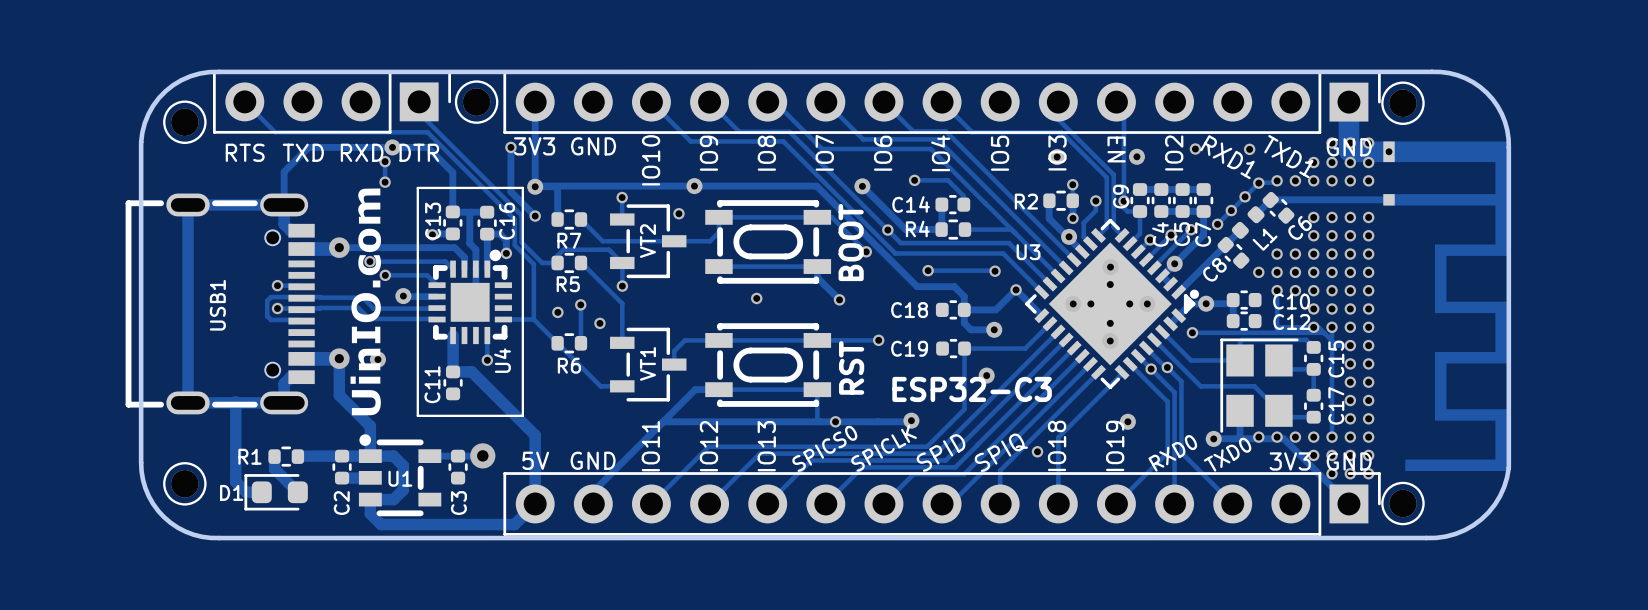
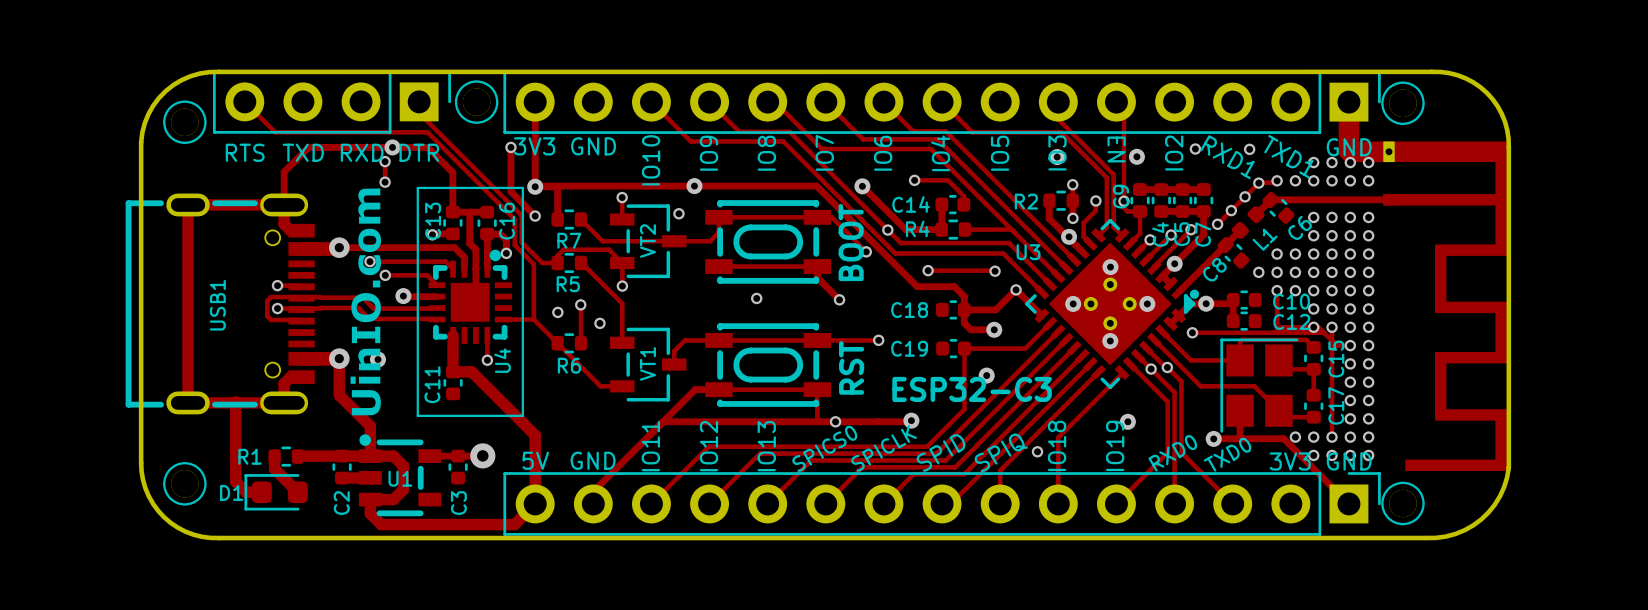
via: (1332, 143) -> none
via: (1350, 143) -> none
via: (1368, 143) -> none
via: (1258, 437) -> none
via: (1277, 437) -> none
via: (1332, 473) -> none
via: (1350, 473) -> none
via: (1368, 473) -> none

